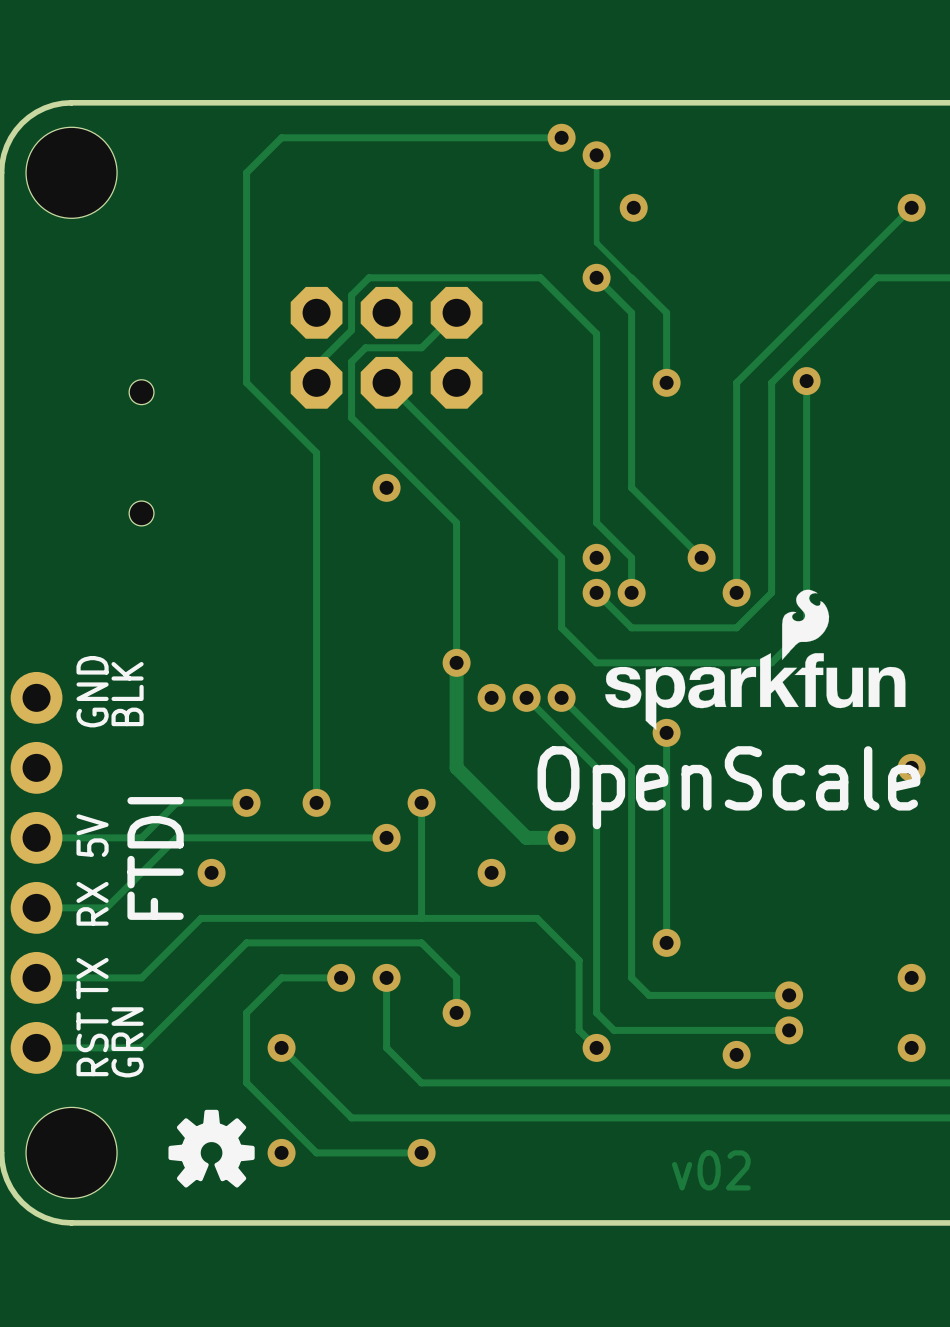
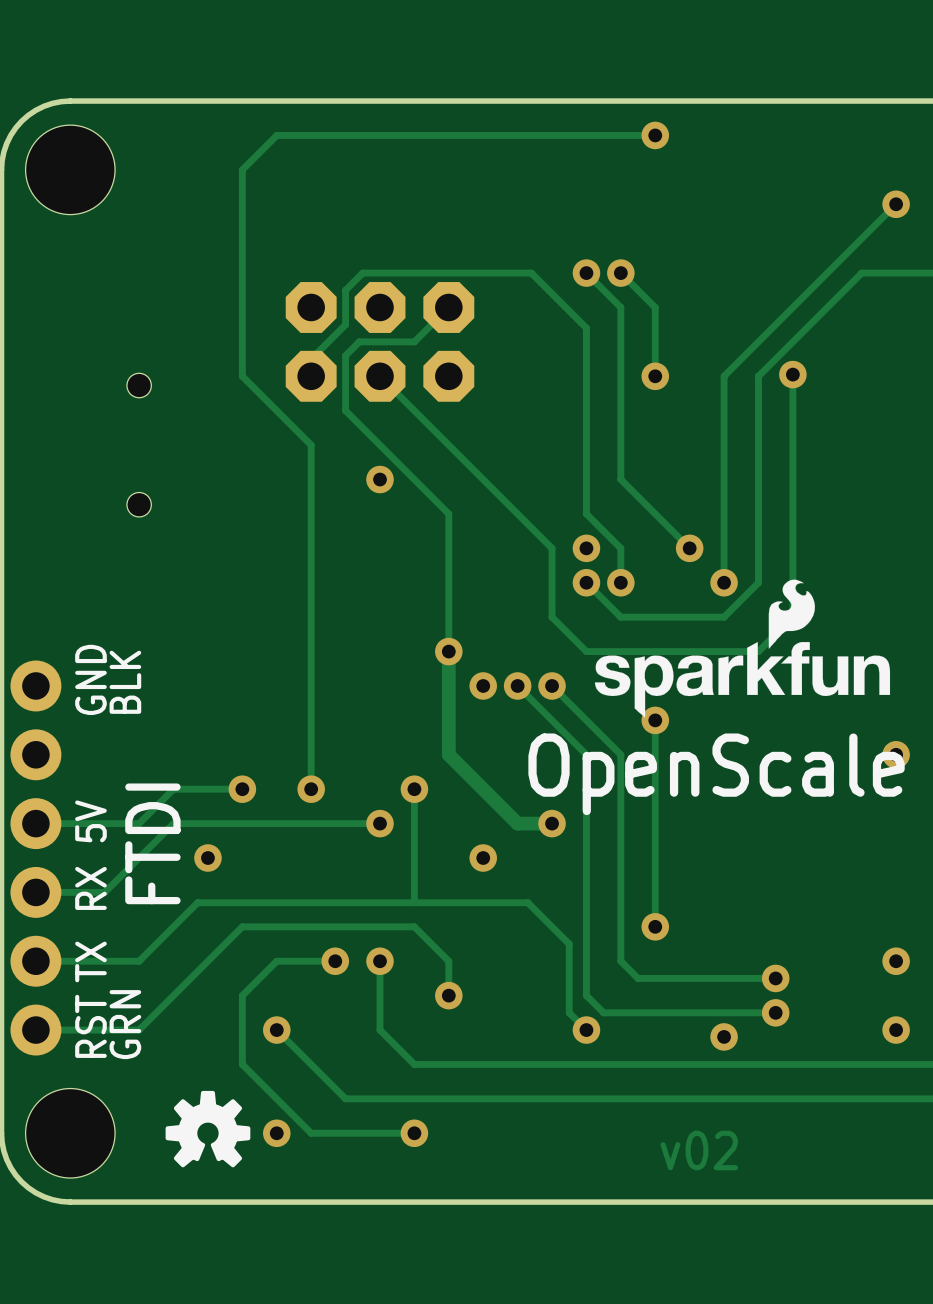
via: (561, 137) -> none
track: none -> (655, 135) (552, 135)
via: none -> (655, 135)
track: (596, 155) (596, 242) (631, 277) -> none
via: (596, 155) -> none
via: (633, 207) -> none
via: none -> (620, 273)

